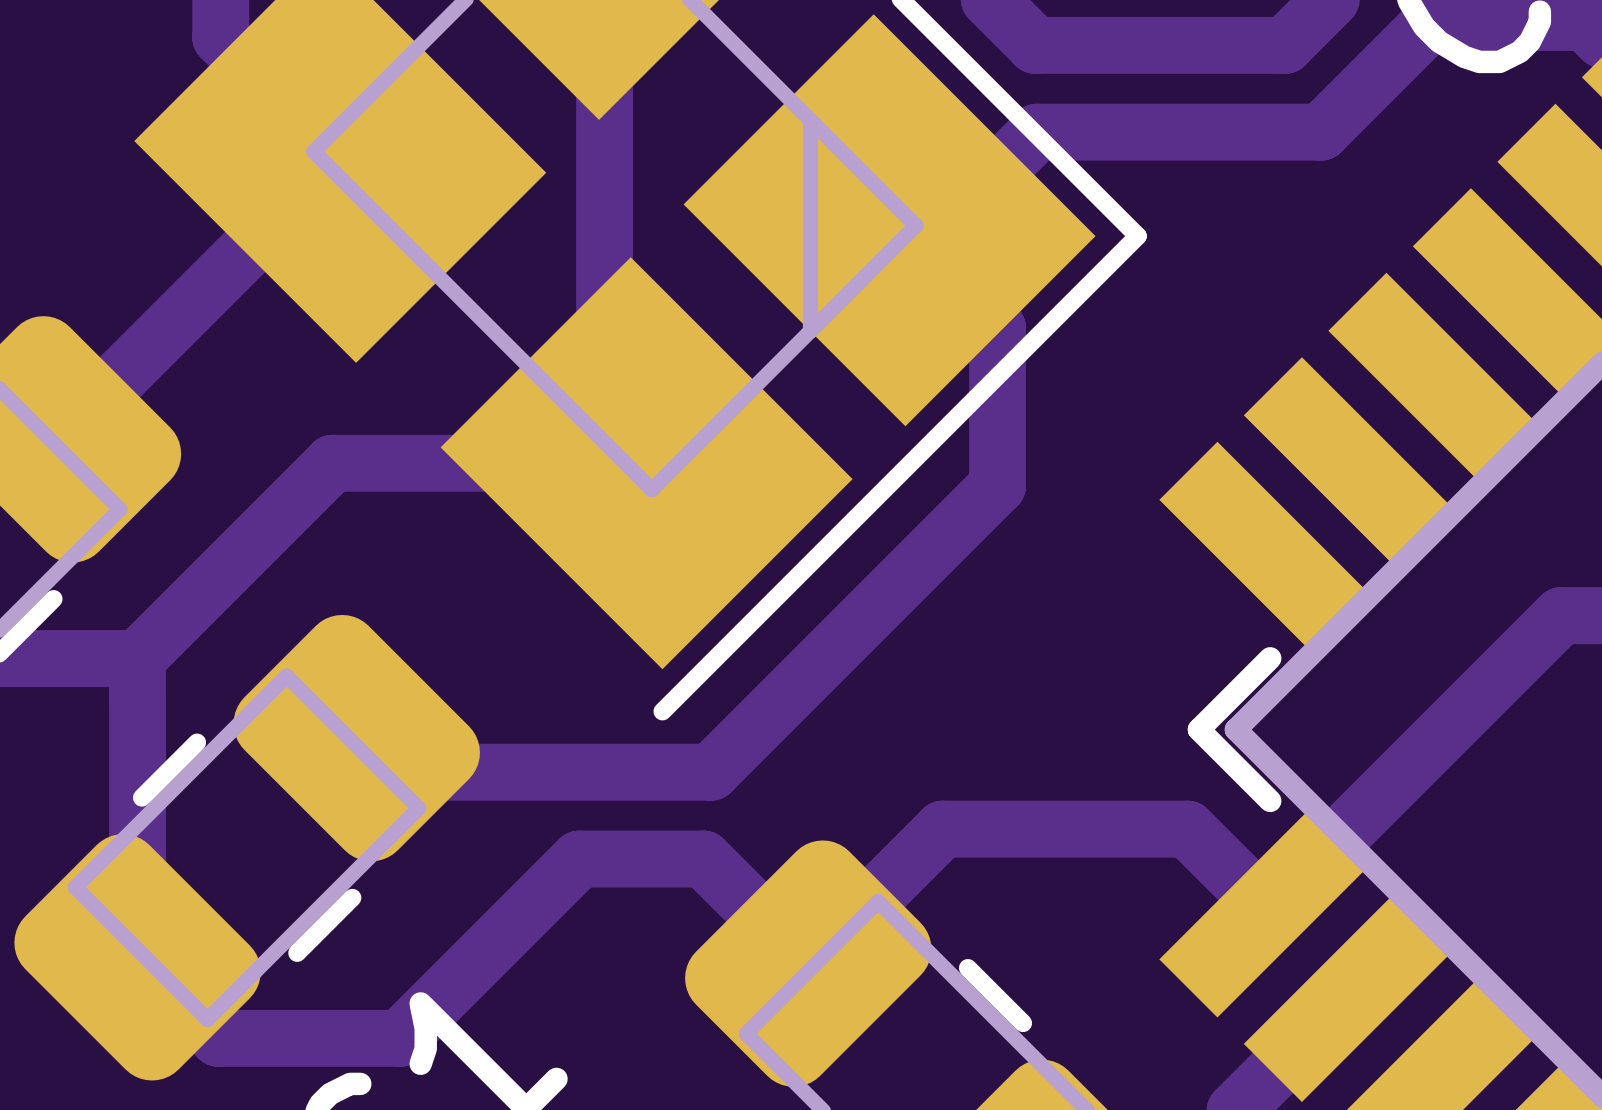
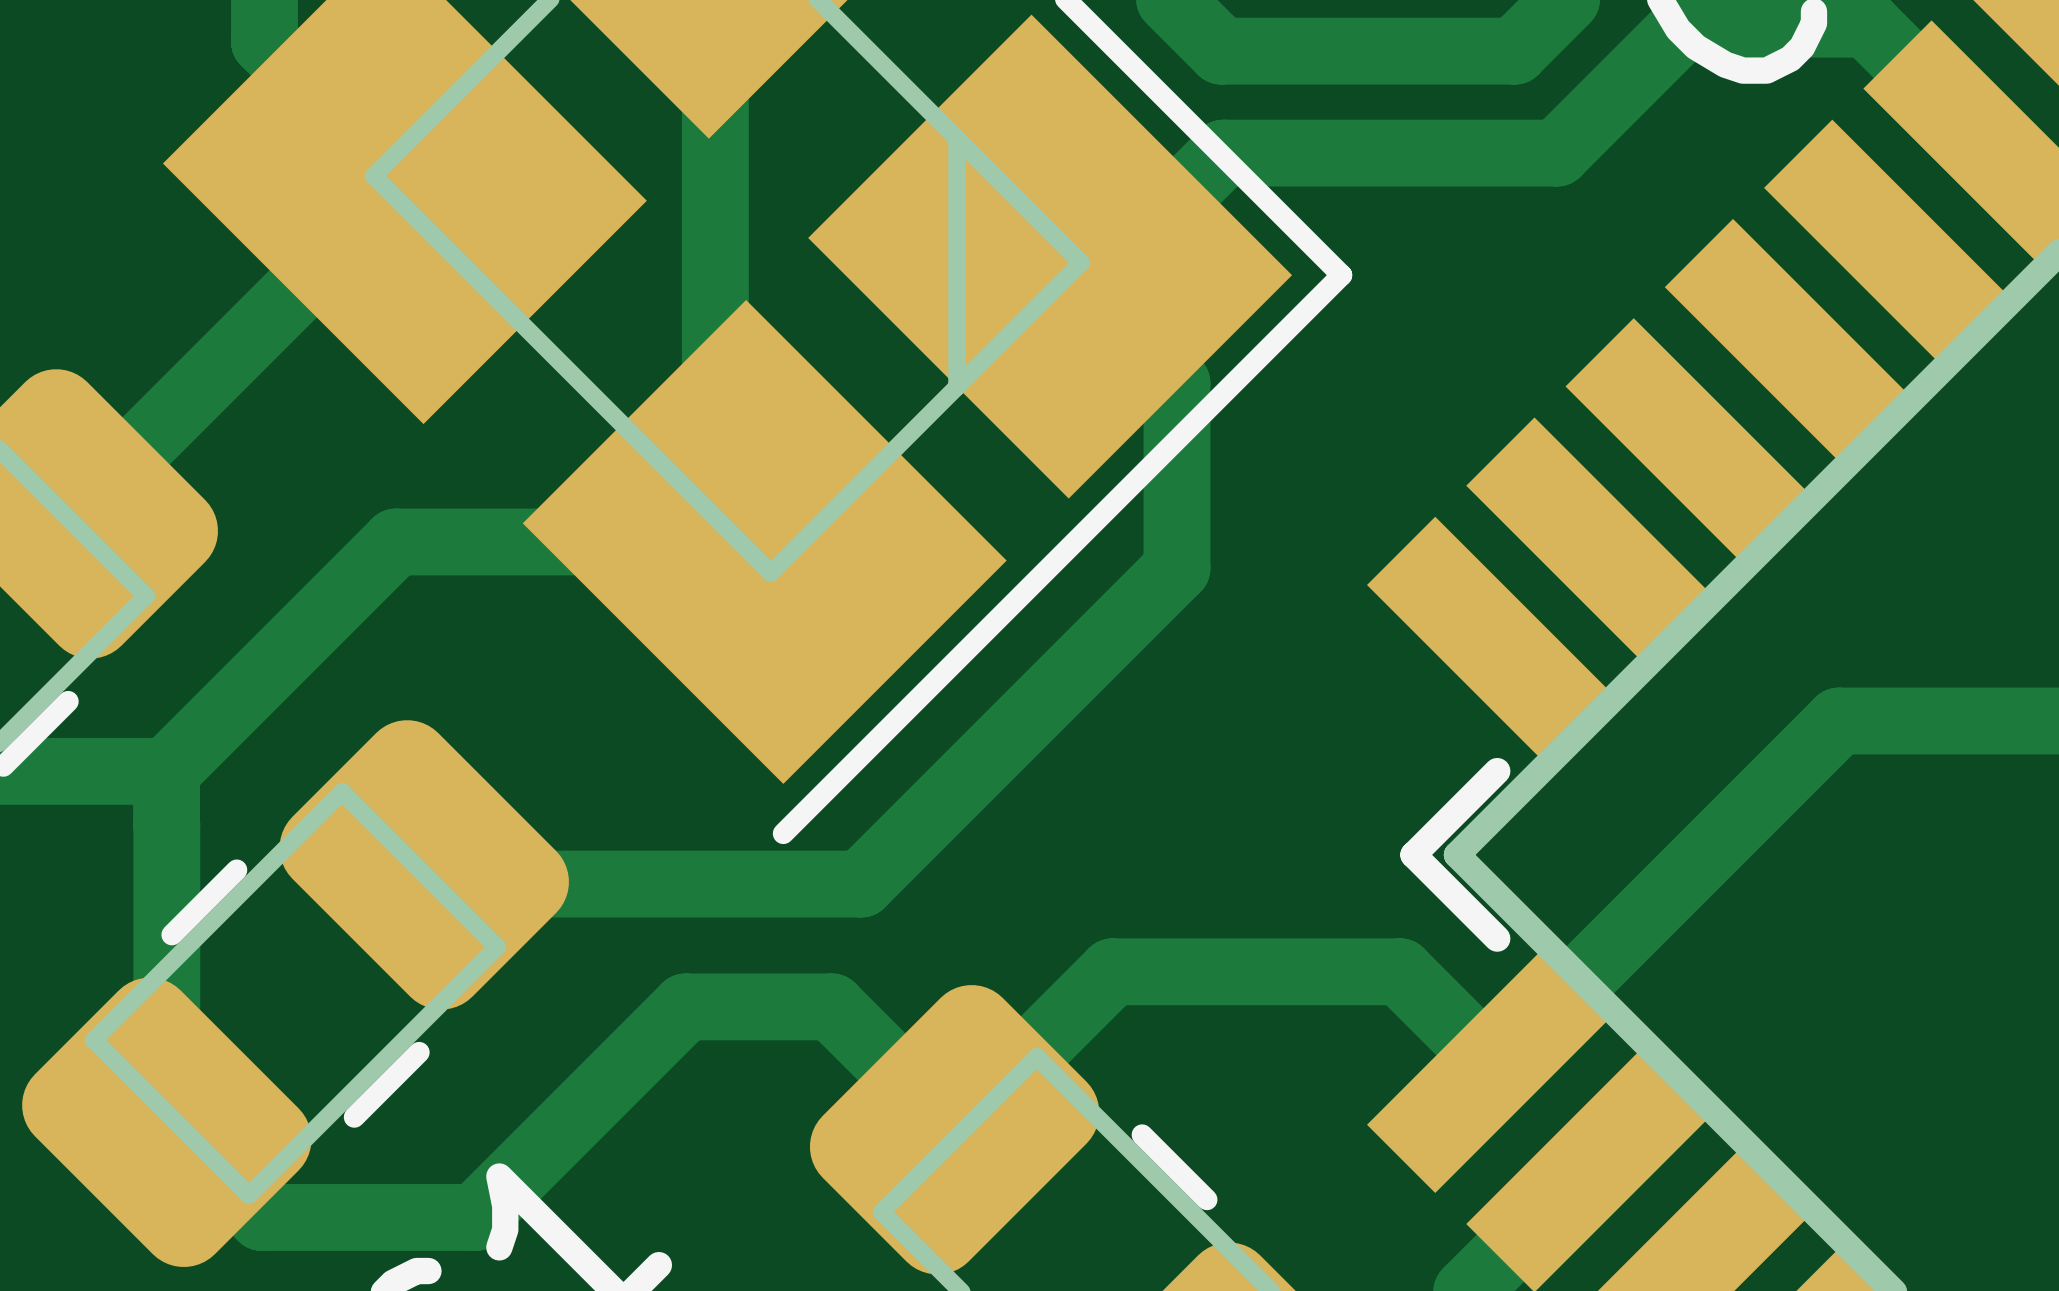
track: (728, 754) (710, 772) (390, 772) (373, 754) -> (861, 884) (443, 884)

